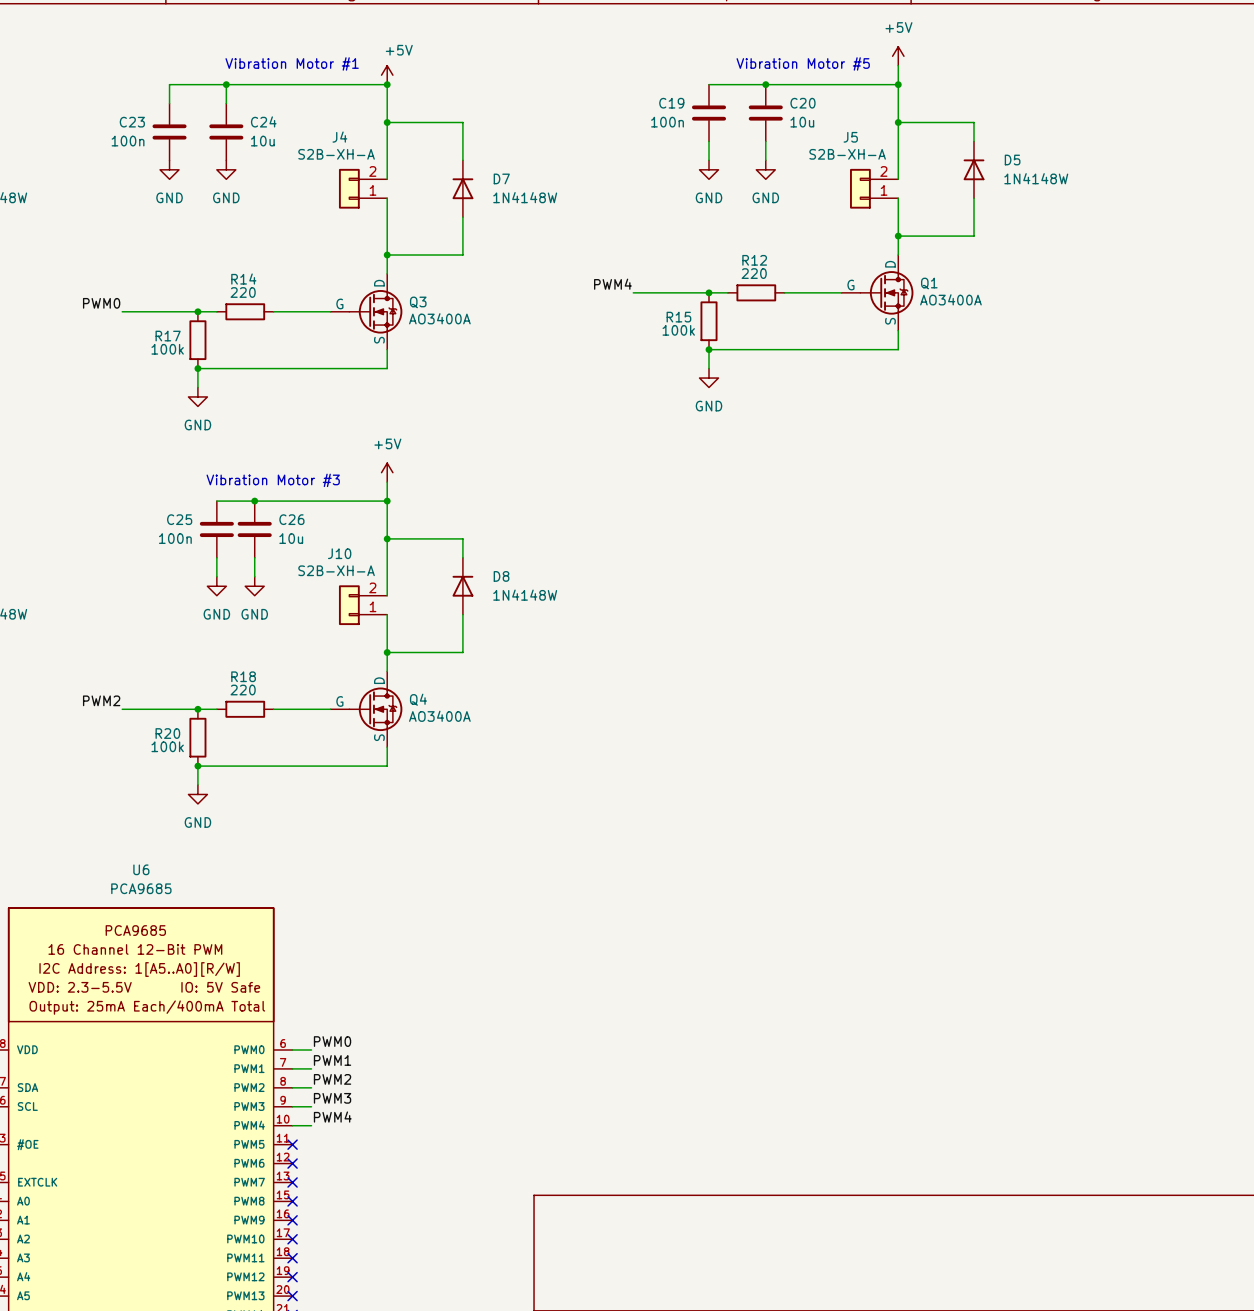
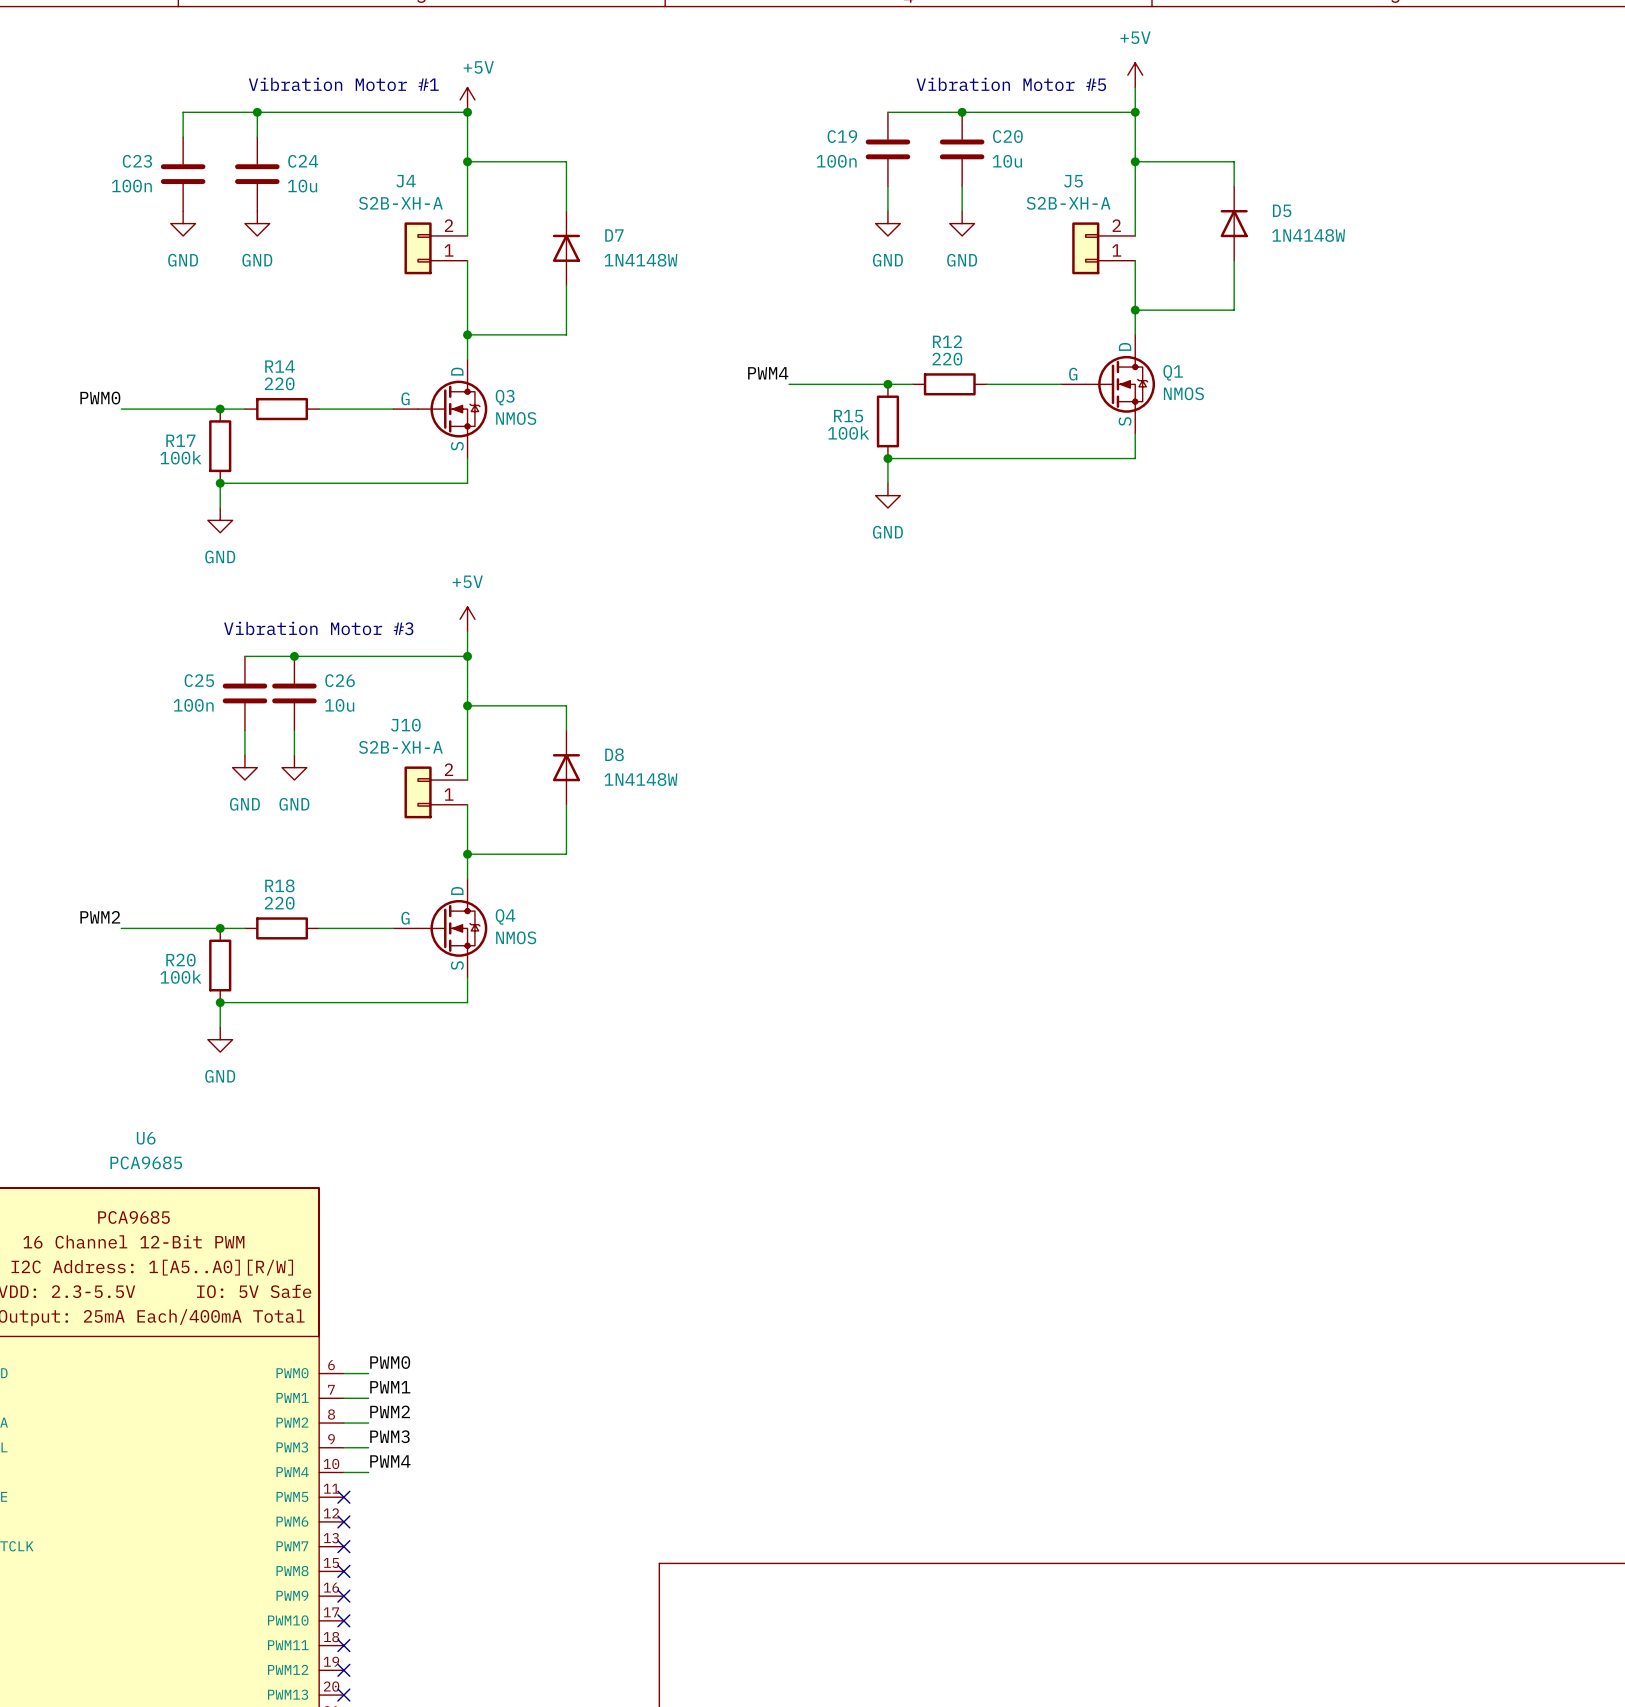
Q1 value: AO3400A (950, 299) -> NMOS (1183, 393)
Q3 value: AO3400A (439, 318) -> NMOS (516, 418)
Q4 value: AO3400A (439, 716) -> NMOS (516, 937)

